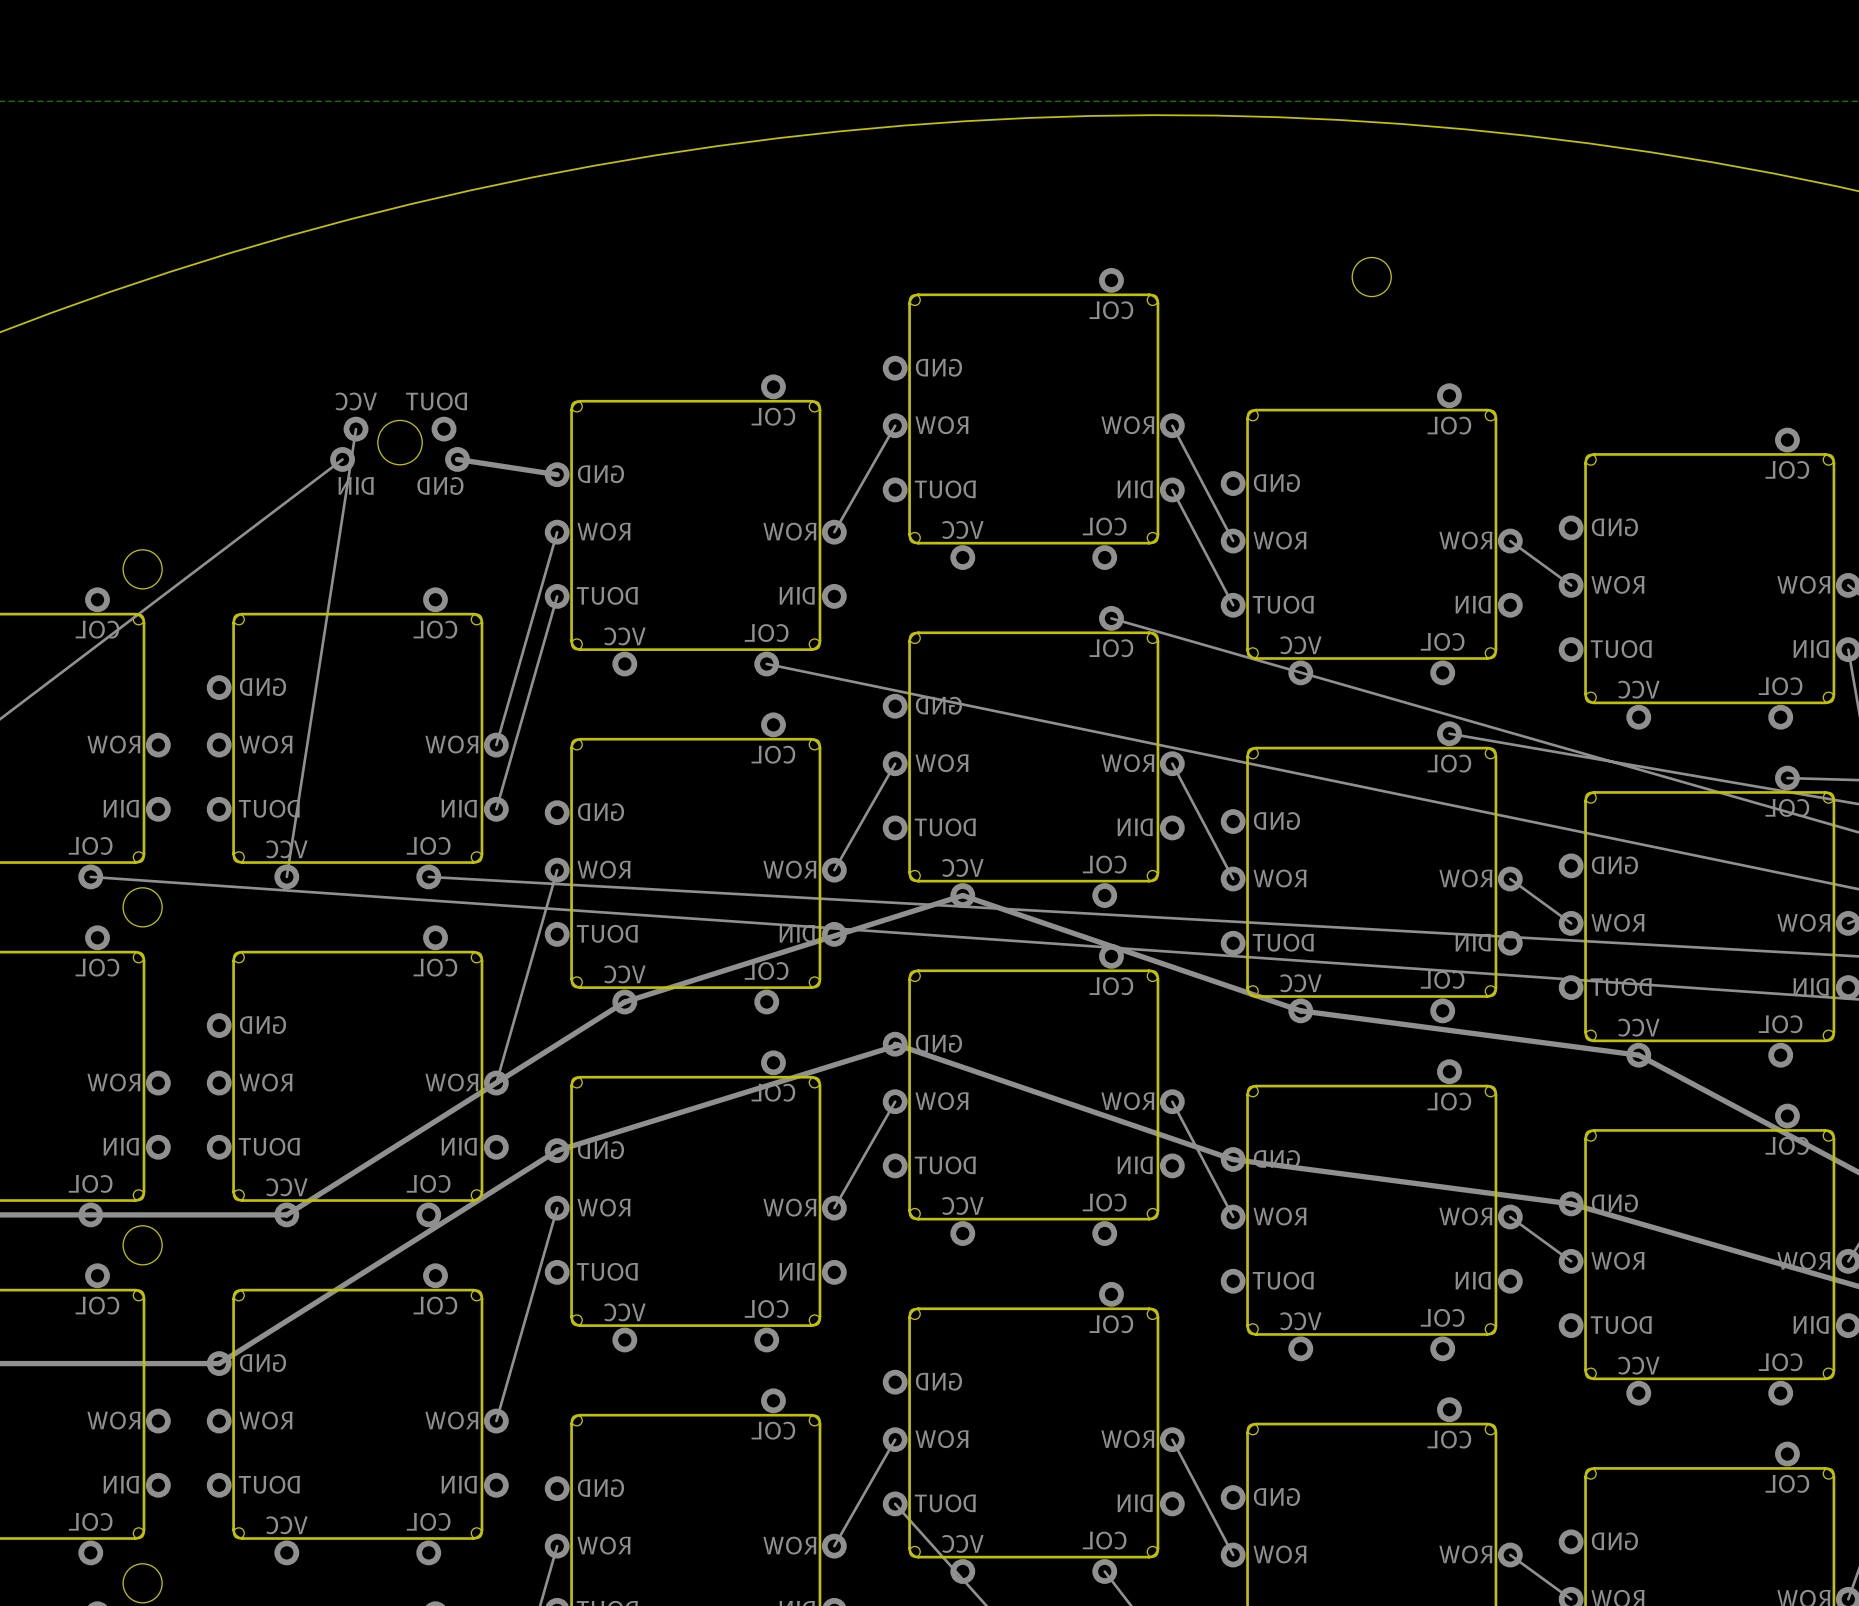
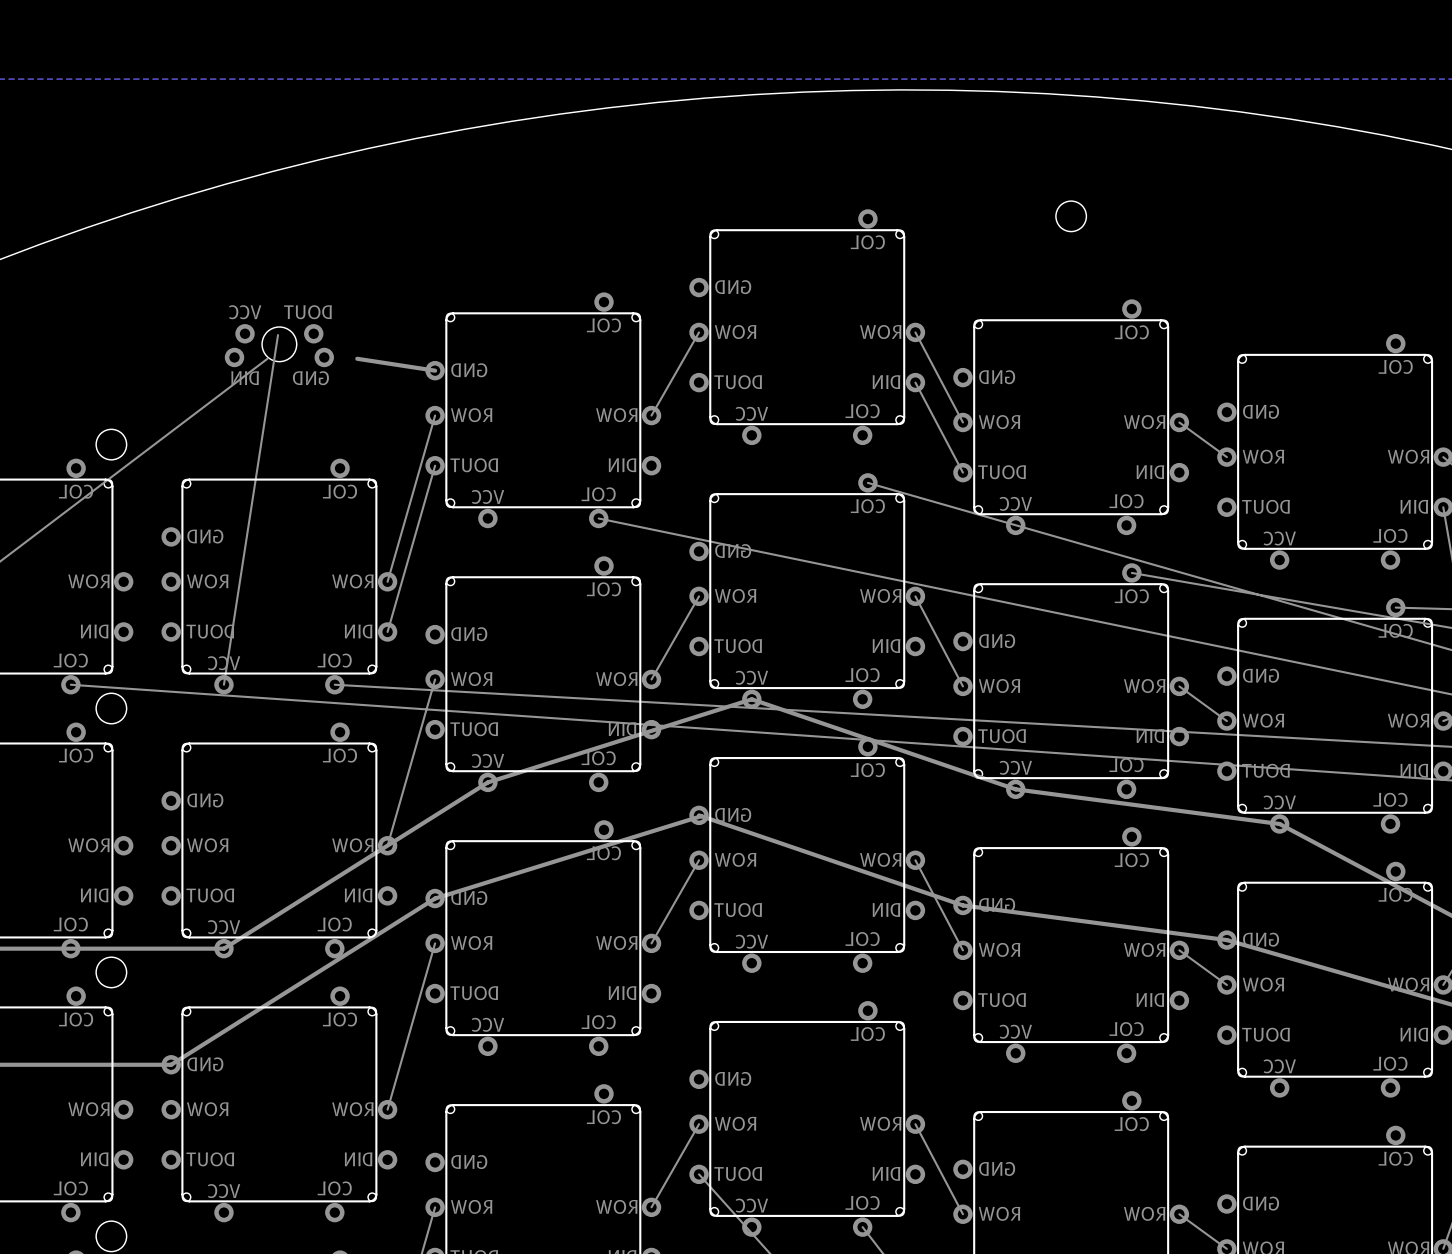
part position: (400, 444) -> (279, 345)

